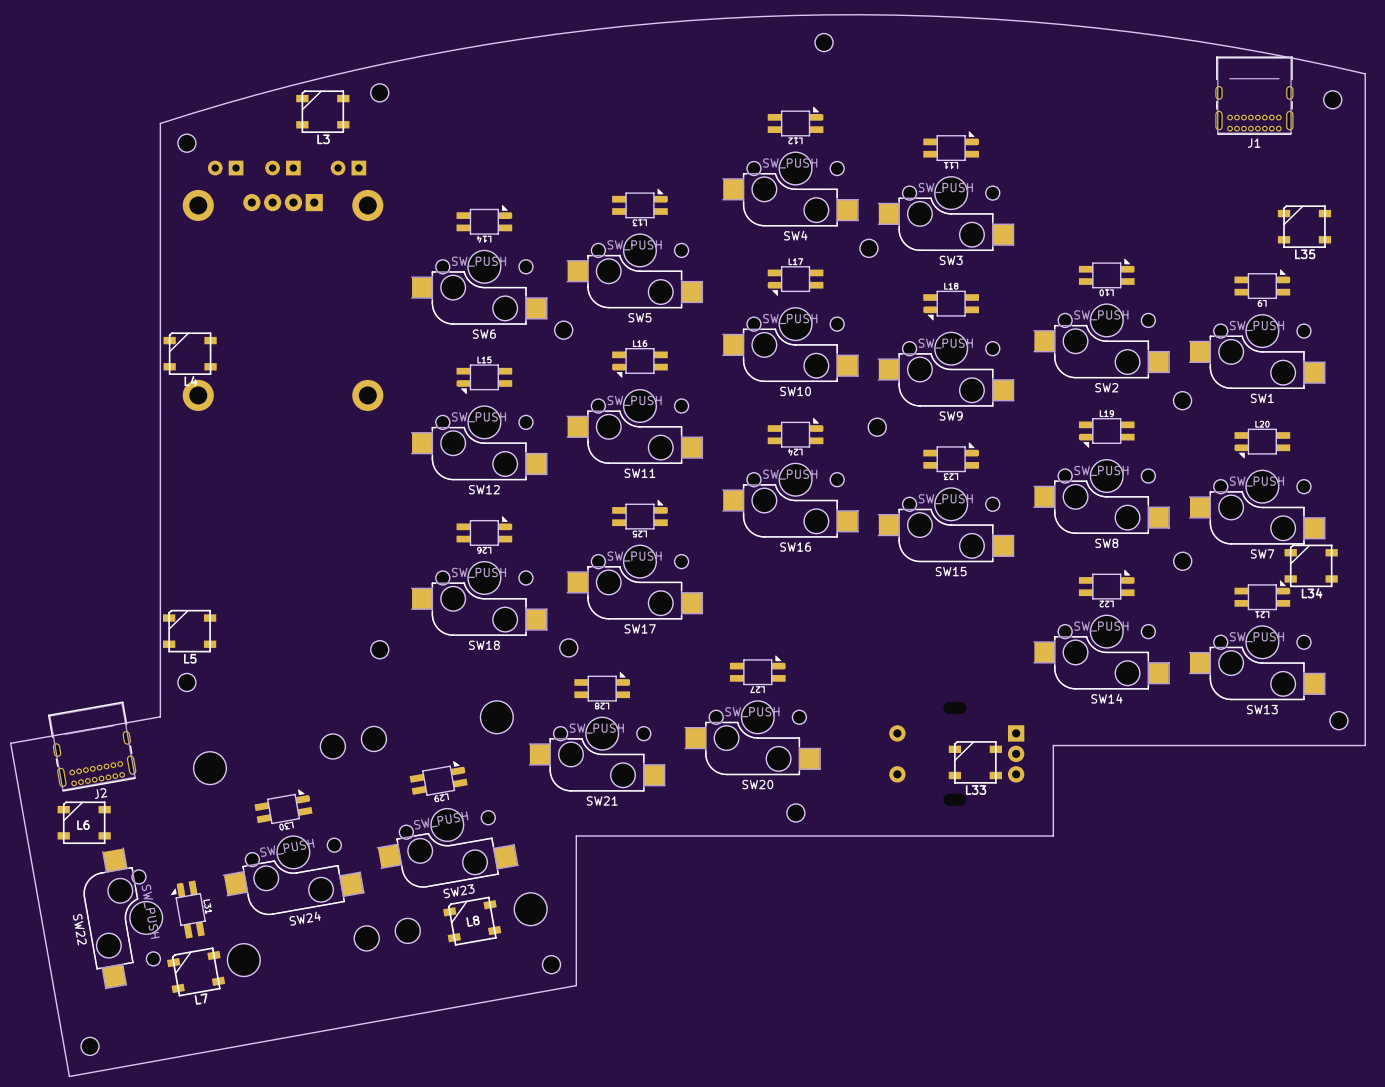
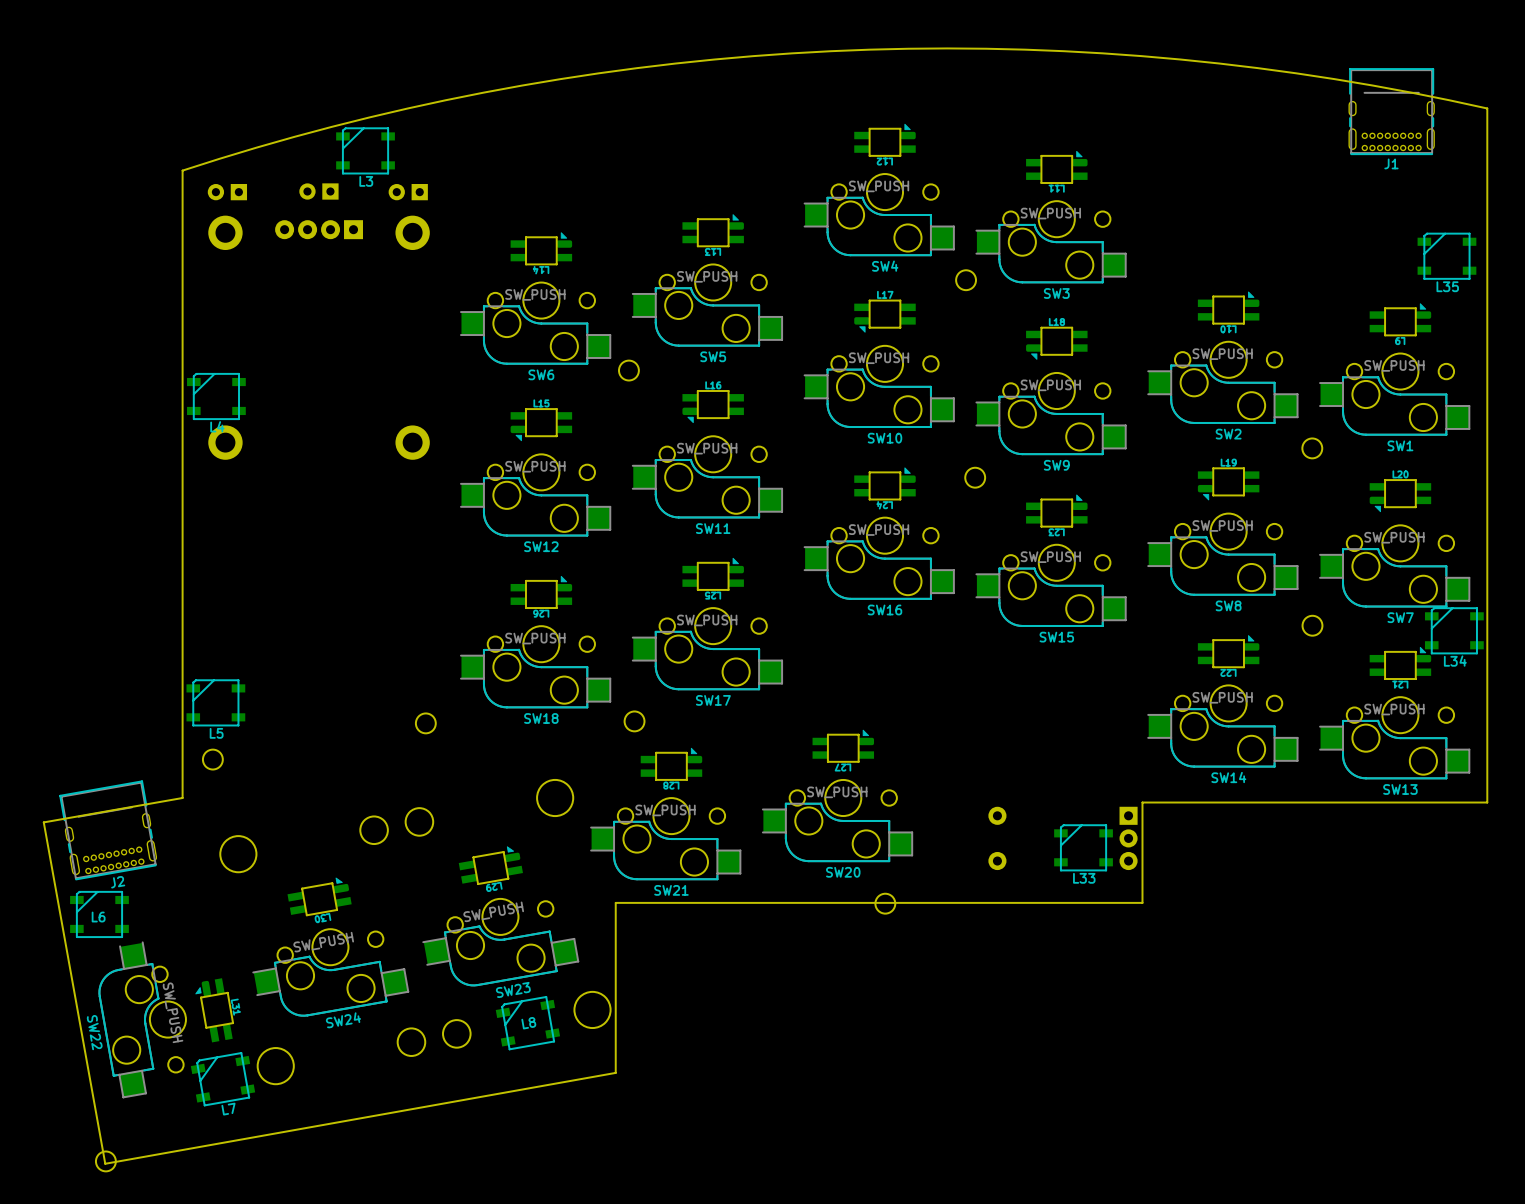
part: (824, 42) -> none
board edge: (1365, 73) (1365, 745) (1053, 745) (1053, 836) (576, 836) (576, 985) (69, 1076) (10, 743) (160, 716) (160, 123) (290, 85) (389, 62) (456, 49) (556, 34) (624, 26) (759, 16) (861, 14) (928, 16) (1064, 24) (1131, 32) (1232, 46) (1298, 59) (1332, 66) (1365, 73) -> (1487, 108) (1334, 79) (1218, 63) (1141, 56) (986, 48) (830, 51) (753, 56) (637, 68) (483, 92) (331, 126) (182, 170) (182, 798) (43, 822) (105, 1163) (615, 1072) (615, 902) (1142, 902) (1142, 802) (1487, 802) (1487, 108)
part: (379, 92) -> none
part: (1332, 99) -> none
L3 position: (322, 111) -> (365, 150)
part: (186, 143) -> none
part position: (225, 168) -> (227, 192)
part position: (348, 168) -> (408, 192)
part: (1338, 720) -> none
part: (551, 964) -> none

